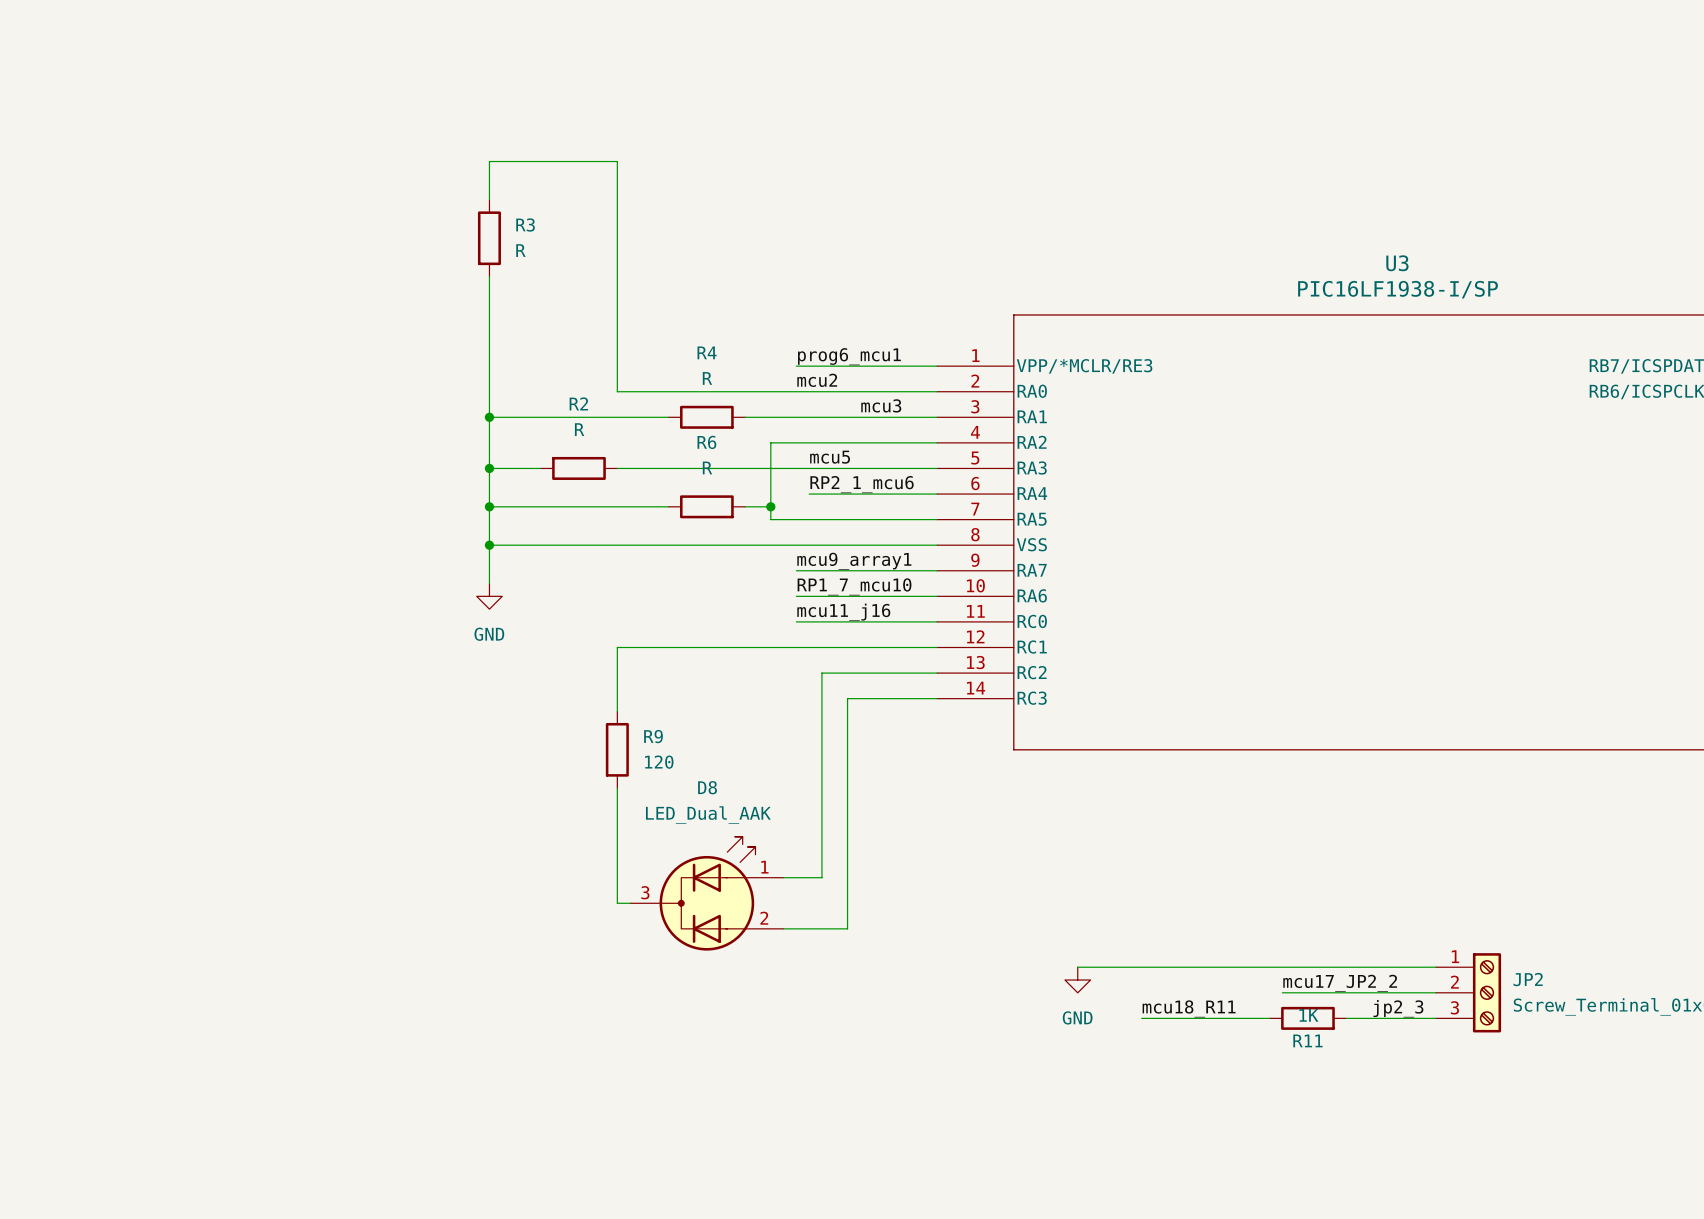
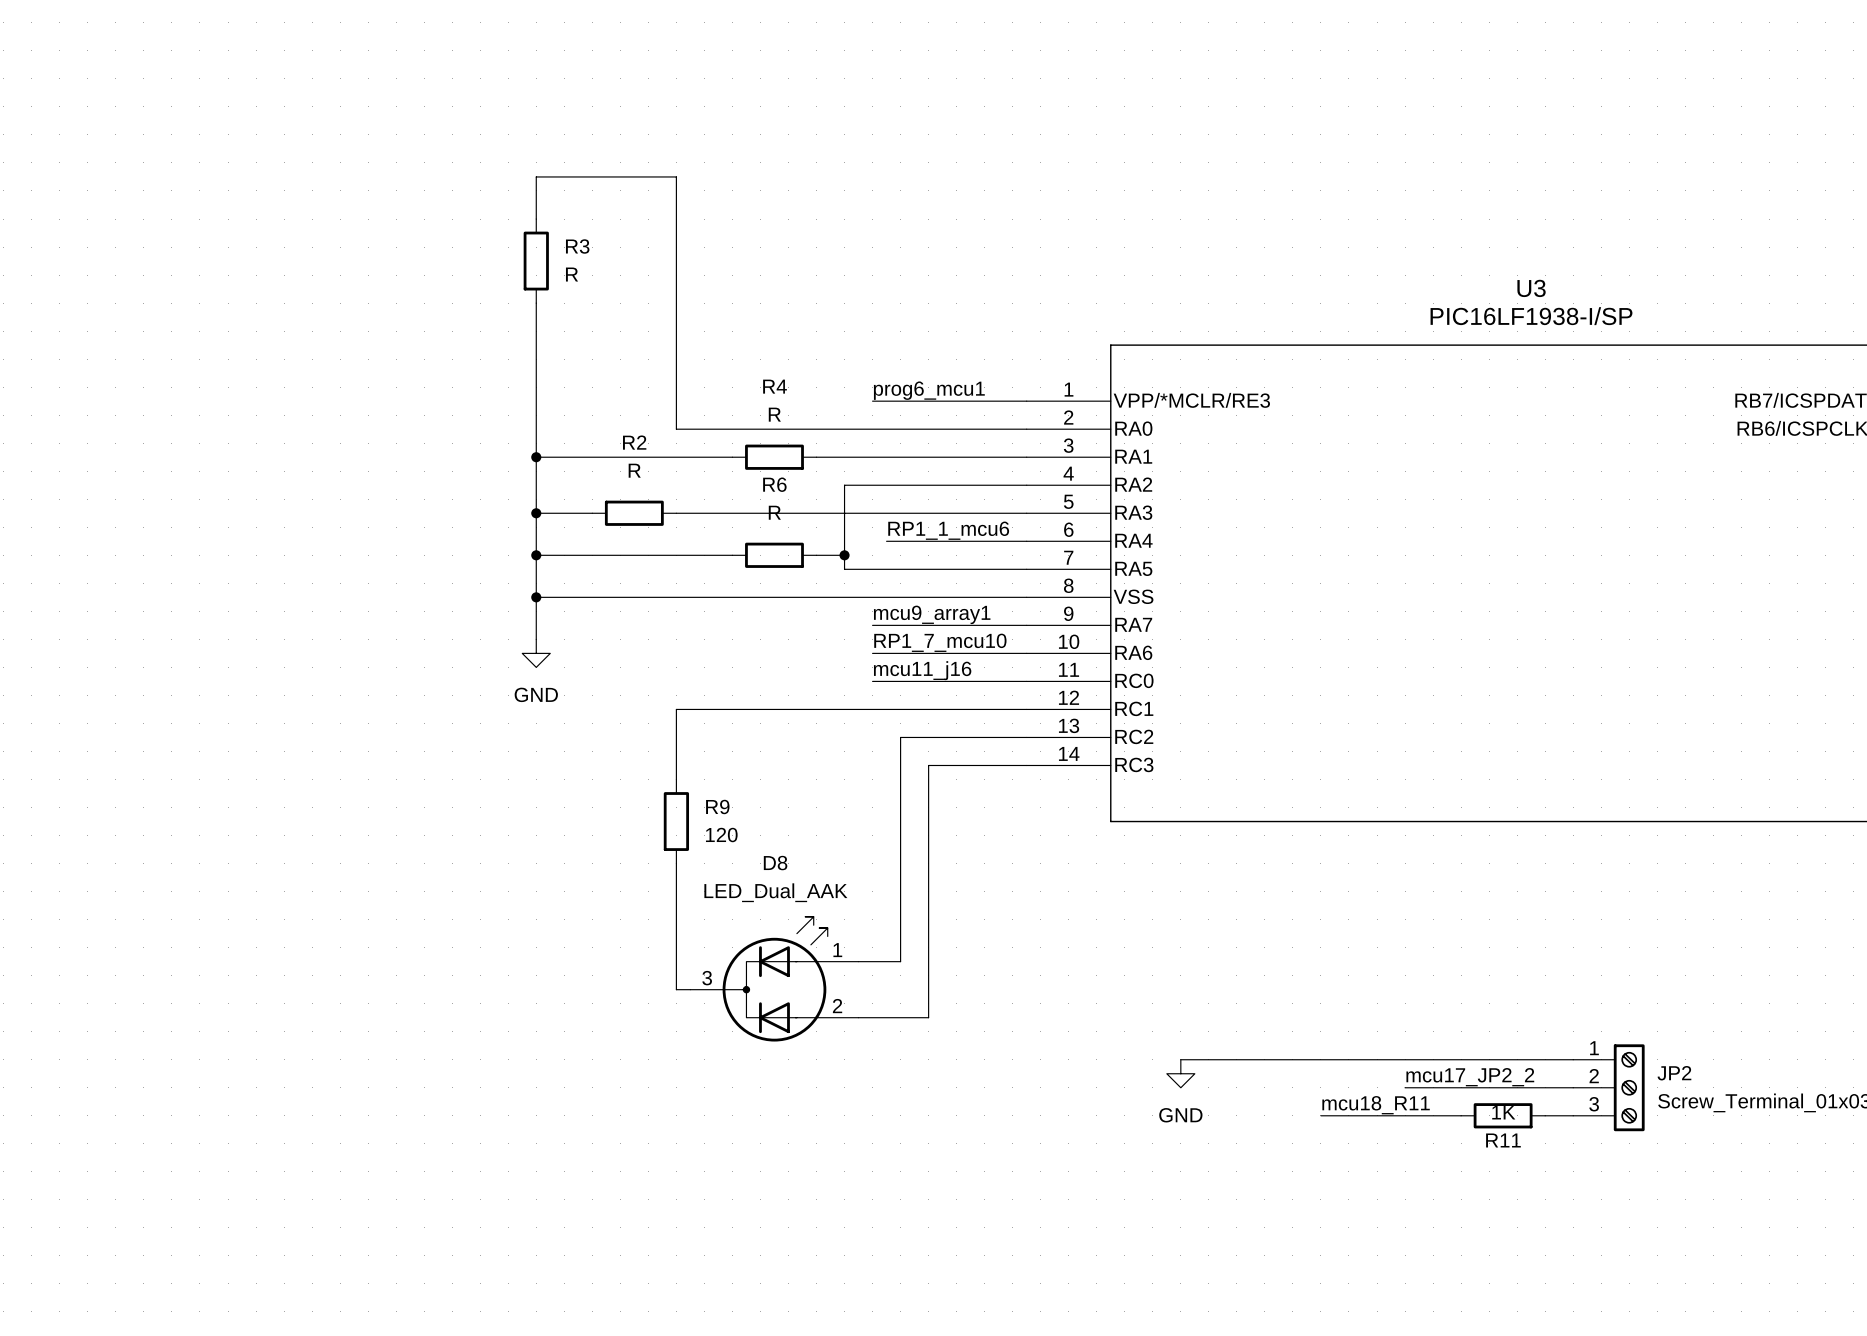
label: mcu2 (817, 380) -> none
label: mcu3 (881, 405) -> none
label: mcu5 (830, 457) -> none
label: RP2_1_mcu6 (862, 484) -> RP1_1_mcu6 (948, 530)
label position: mcu18_R11 (1189, 1008) -> mcu18_R11 (1376, 1105)
label: jp2_3 (1398, 1008) -> none
wire: (1141, 1018) (1205, 1018) -> none
R11 position: (1307, 1018) -> (1503, 1115)
wire: (1346, 1018) (1410, 1018) -> (1391, 1115) (1461, 1115)

